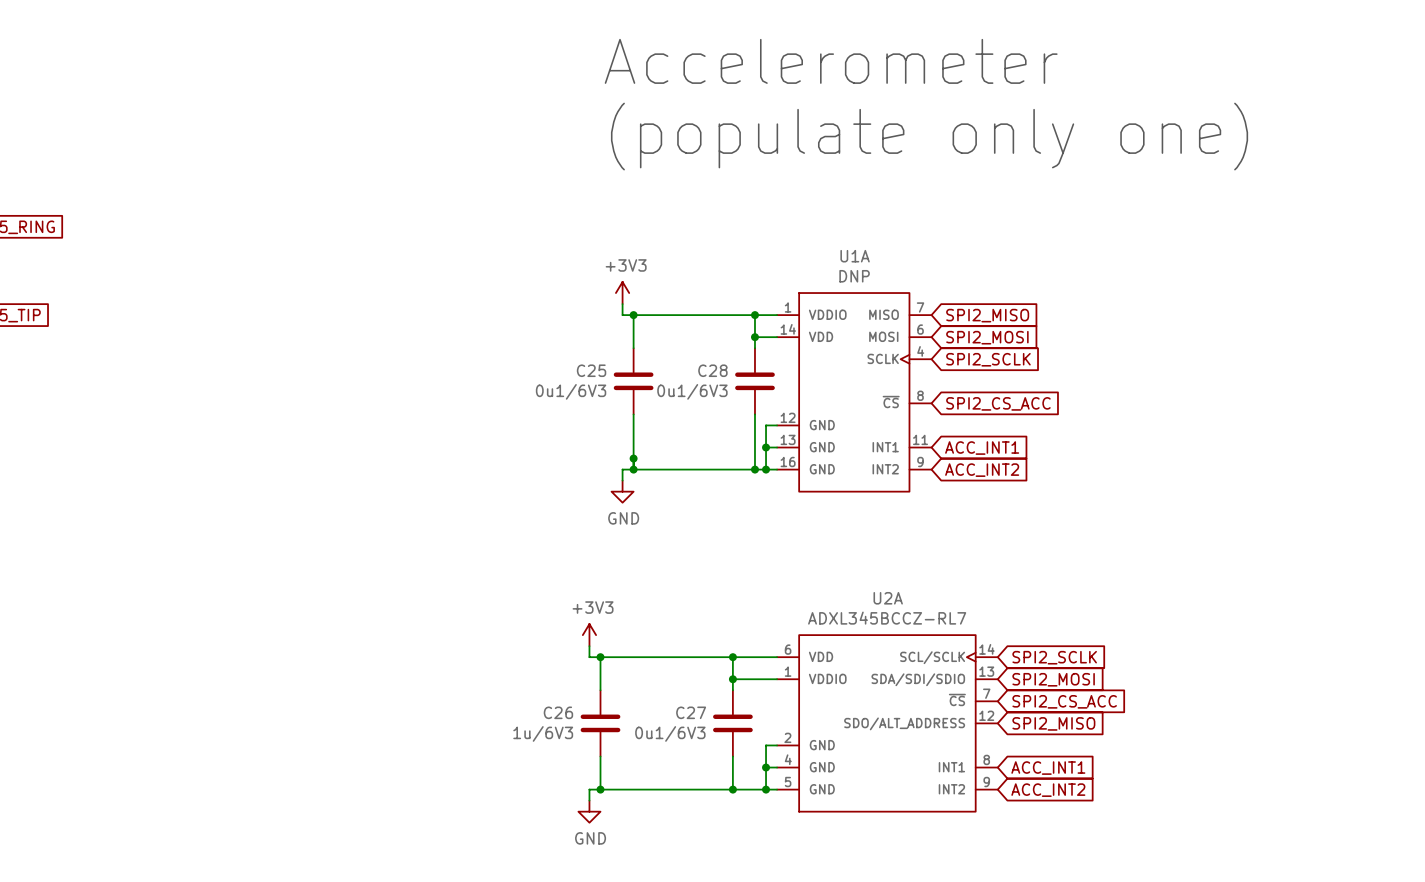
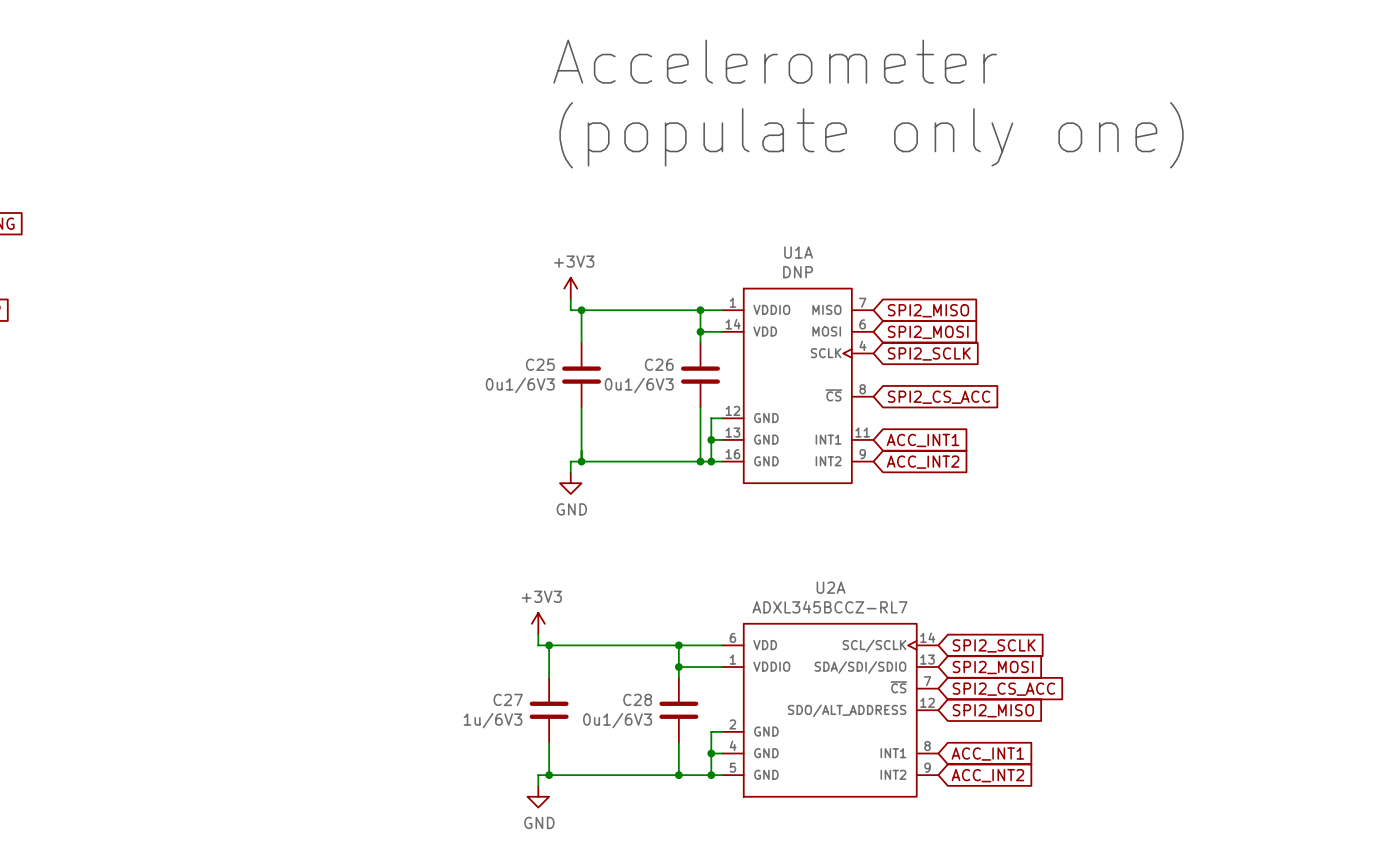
C28 name: C28 (712, 370) -> C26 (659, 364)
junction: (633, 458) -> none
C26 name: C26 (558, 712) -> C27 (508, 699)
C27 name: C27 (691, 712) -> C28 (637, 699)

